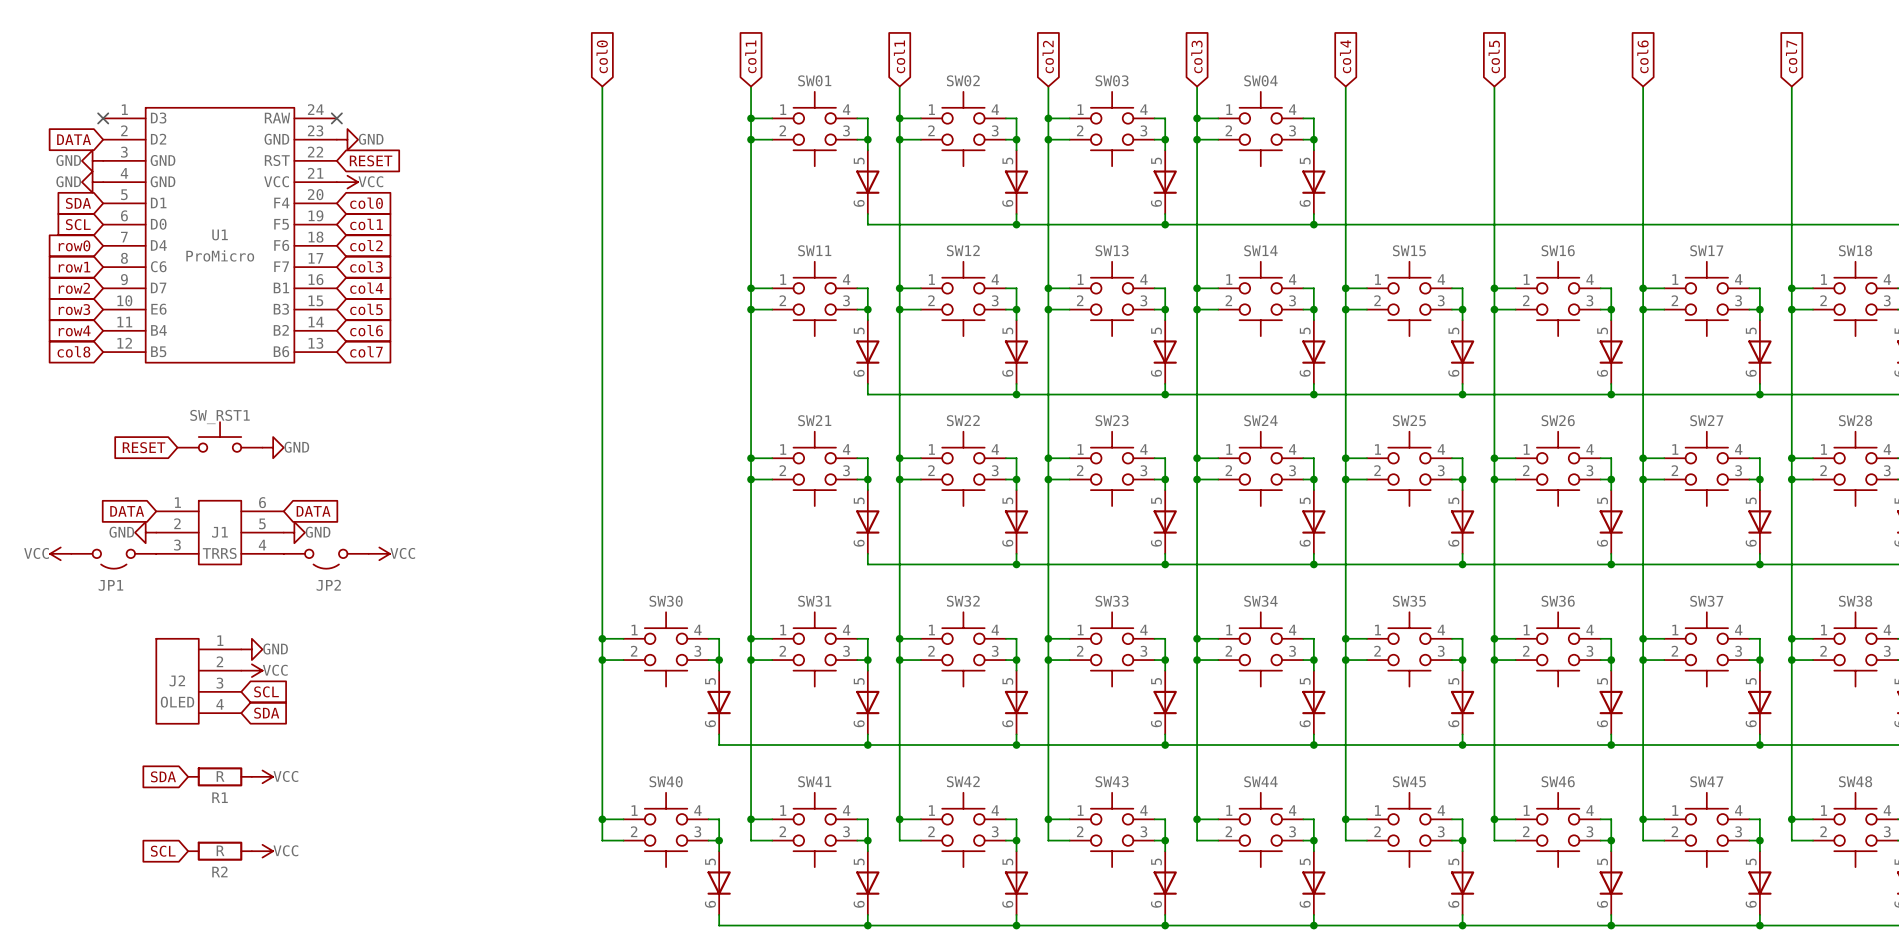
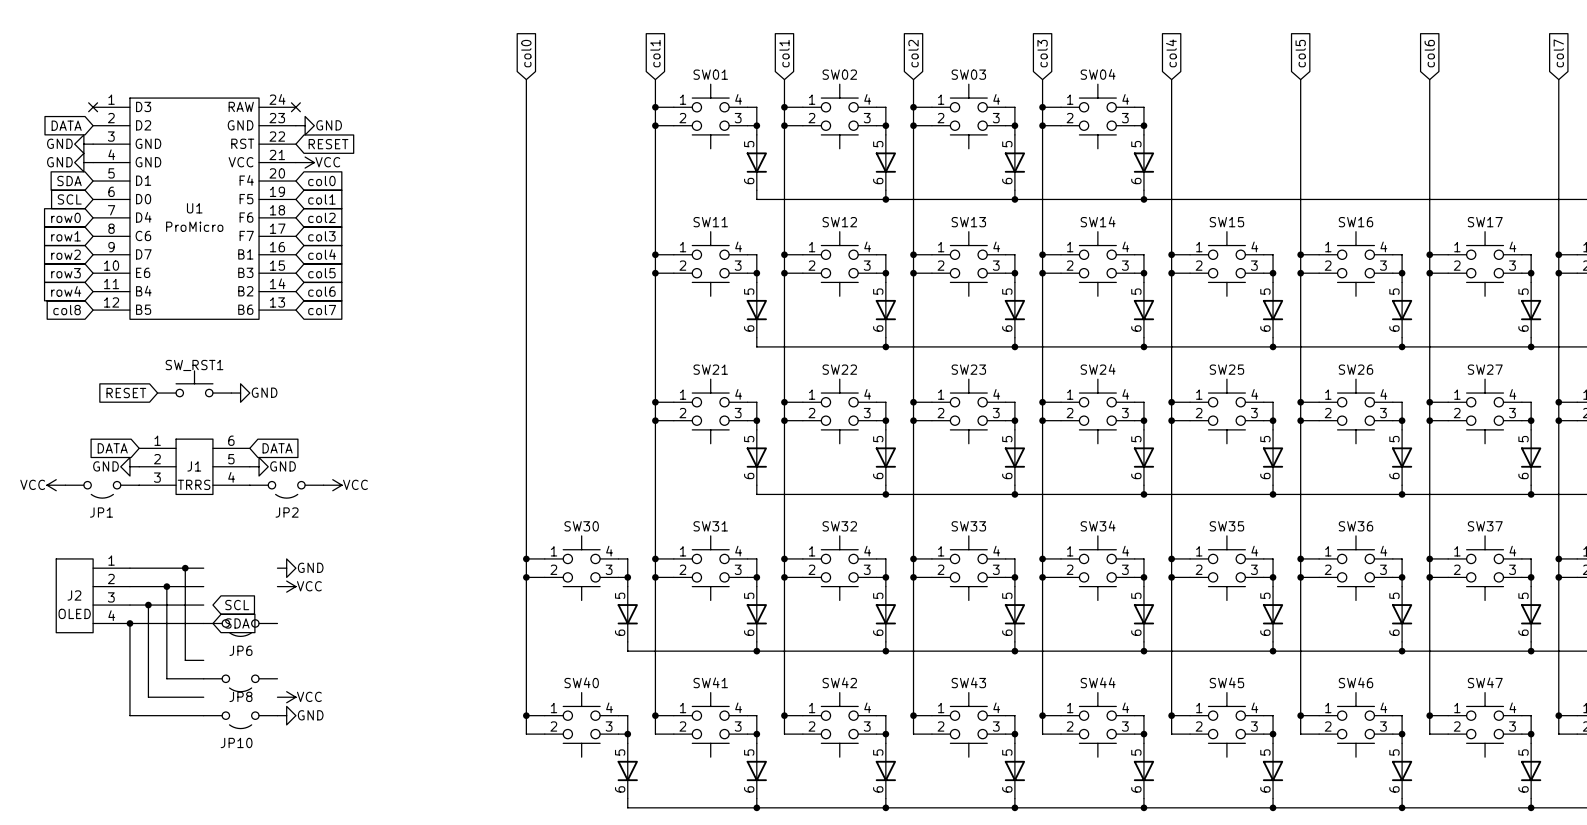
wire: none -> (129, 568) (203, 568)
wire: none -> (185, 568) (185, 660) (203, 660)
junction: none -> (185, 568)
power symbol position: GND (251, 649) -> GND (286, 568)
wire: none -> (129, 586) (203, 586)
wire: none -> (166, 586) (166, 678) (203, 678)
junction: none -> (166, 586)
power symbol: VCC (251, 670) -> none
power symbol: none -> VCC (286, 586)
J2 position: (198, 681) -> (93, 595)
wire: none -> (129, 605) (203, 605)
wire: none -> (148, 605) (148, 697) (203, 697)
junction: none -> (148, 605)
junction: none -> (129, 623)
wire: none -> (203, 623) (129, 623) (129, 715) (203, 715)
JP6: none -> (240, 628)
global label: SDA (163, 776) -> none
R1: R (220, 776) -> none
power symbol: VCC (262, 776) -> none
JP8: none -> (240, 683)
power symbol: none -> VCC (286, 697)
power symbol: none -> GND (286, 715)
JP10: none -> (240, 720)
global label: SCL (163, 851) -> none
R2: R (220, 851) -> none
power symbol: VCC (262, 851) -> none

